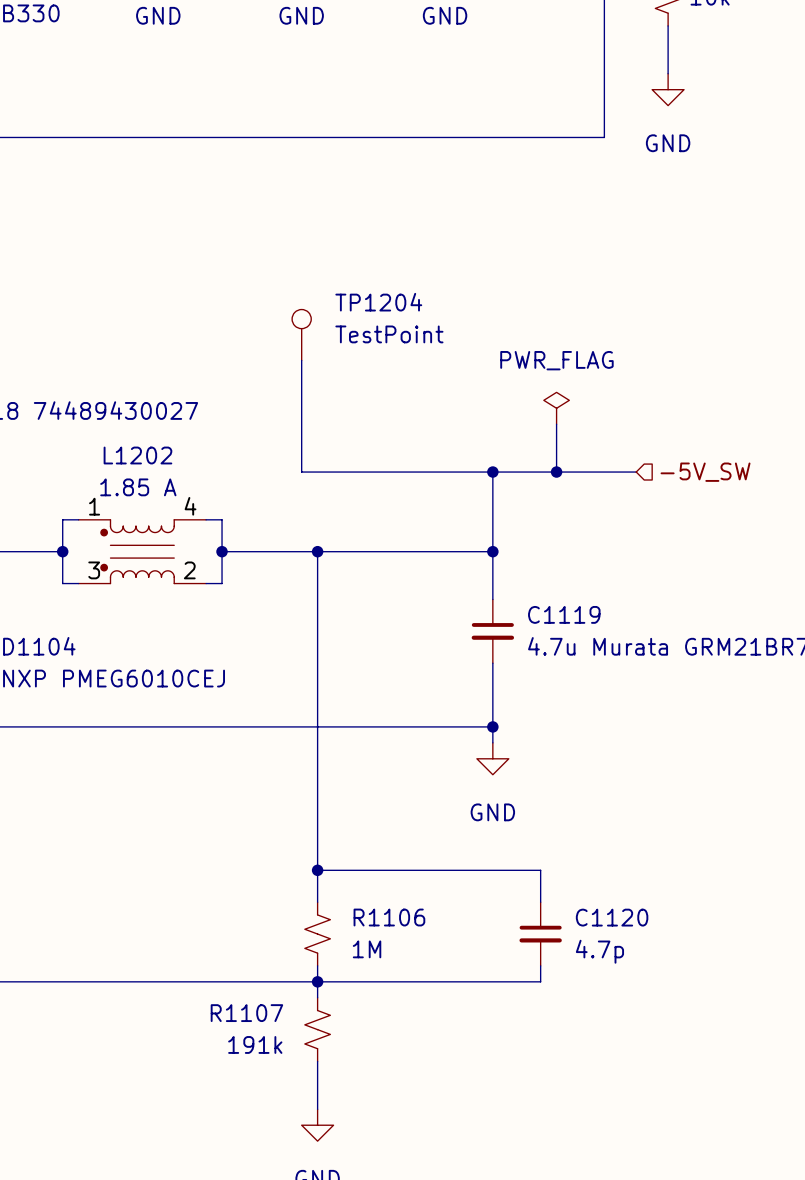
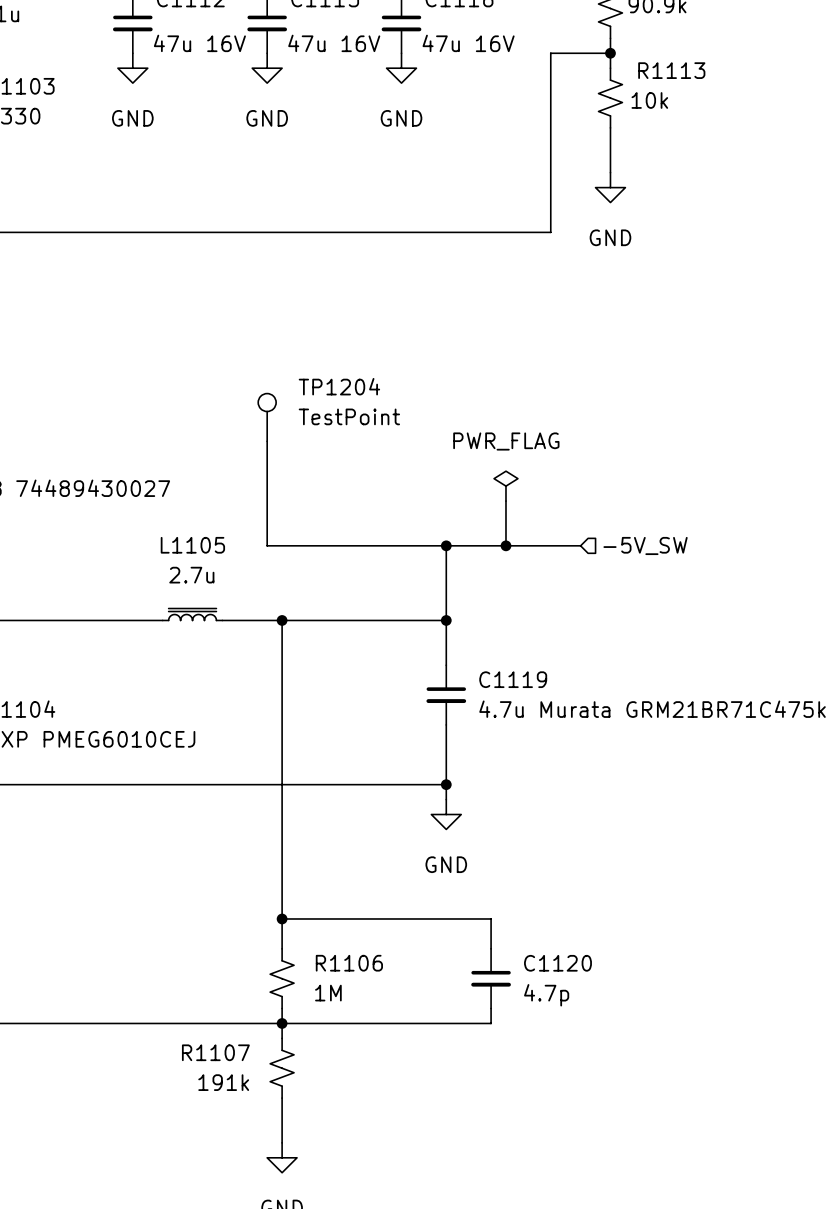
wire: (78, 519) (62, 519) (62, 583) (78, 583) -> none
wire: (206, 519) (222, 519) (222, 583) (206, 583) -> none
L1105: none -> 2.7u (192, 614)
wire: none -> (43, 620) (162, 620)
junction: (62, 551) -> none
L1202: (142, 551) -> none
wire: (222, 551) (253, 551) -> none
junction: (222, 551) -> none

